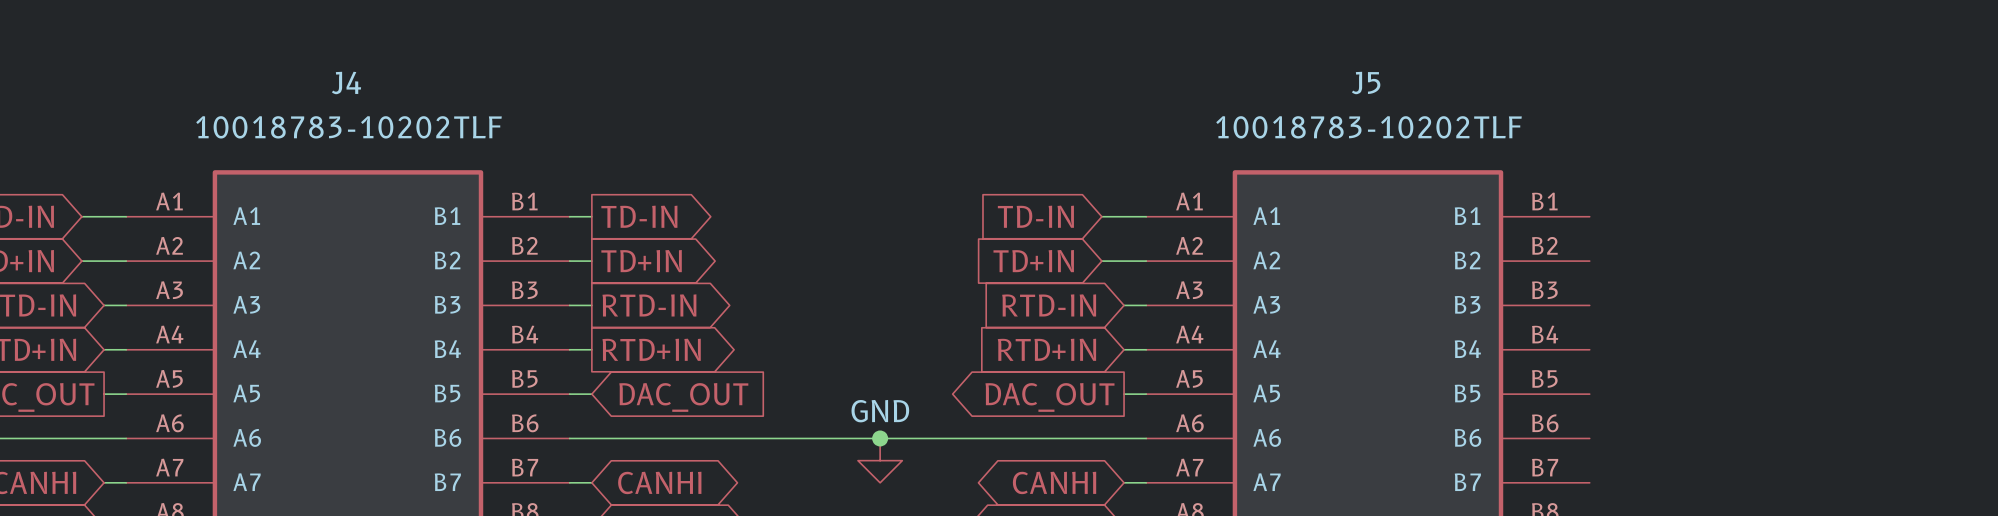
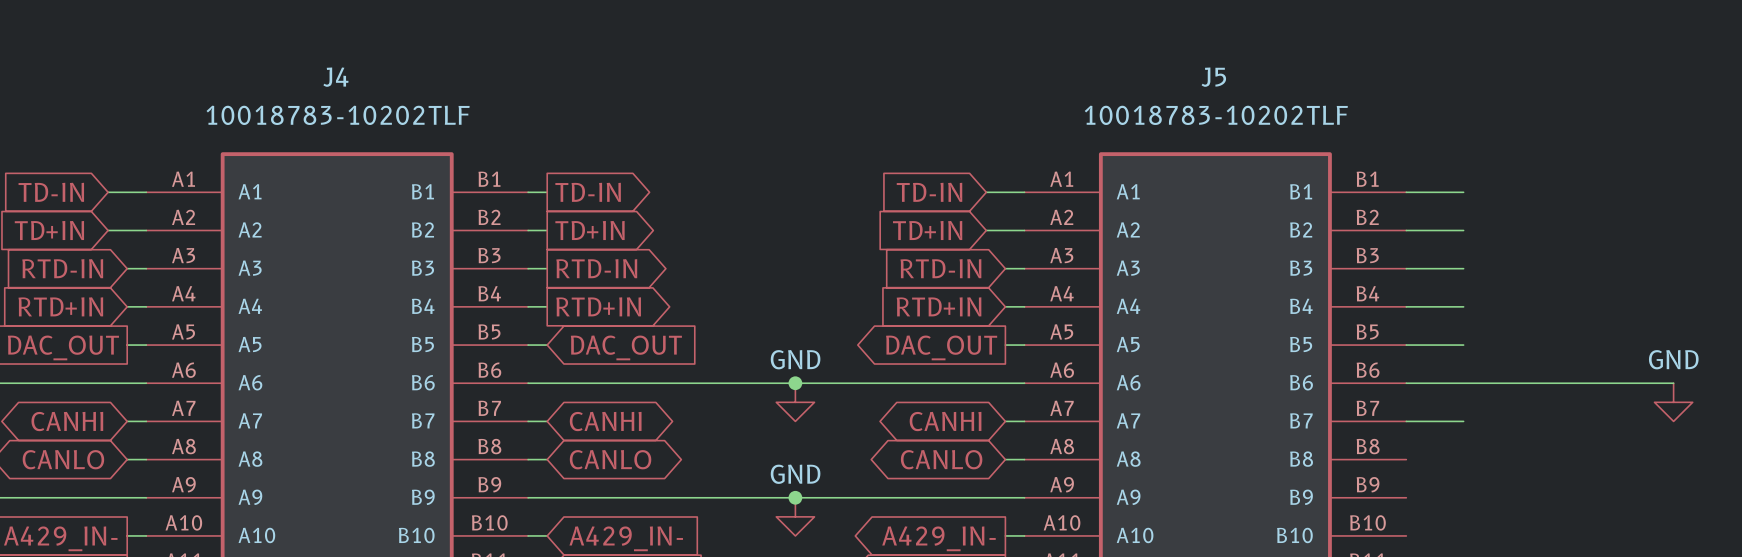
wire: none -> (1406, 192) (1463, 192)
wire: none -> (1406, 230) (1463, 230)
wire: none -> (1406, 268) (1463, 268)
wire: none -> (1406, 306) (1463, 306)
wire: none -> (1406, 345) (1463, 345)
wire: none -> (1406, 383) (1673, 383)
power symbol: none -> GND (1673, 402)
wire: none -> (1406, 421) (1463, 421)

